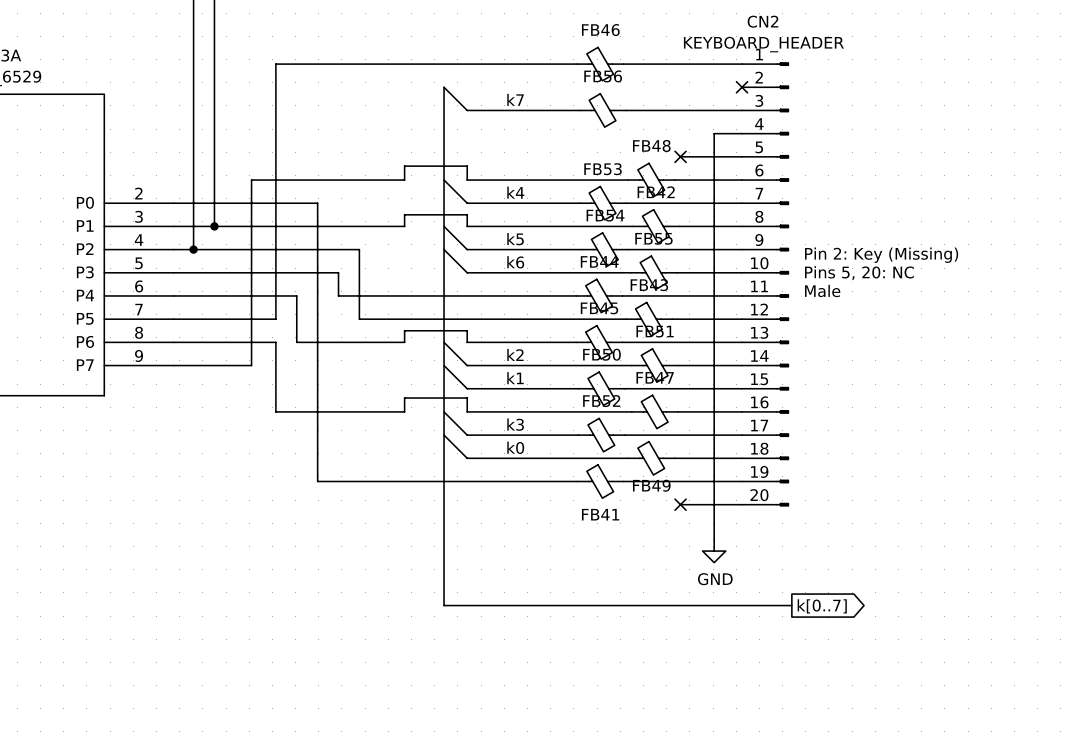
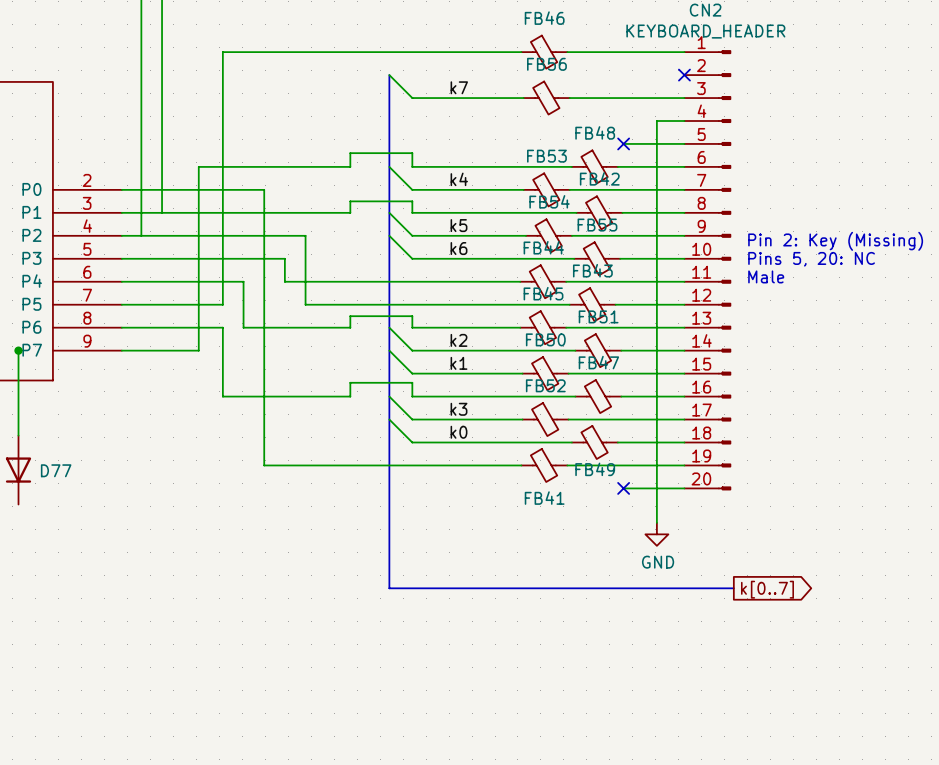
junction: (214, 226) -> none
junction: (193, 249) -> none
wire: none -> (18, 350) (18, 435)
junction: none -> (18, 350)
D77: none -> (18, 470)

